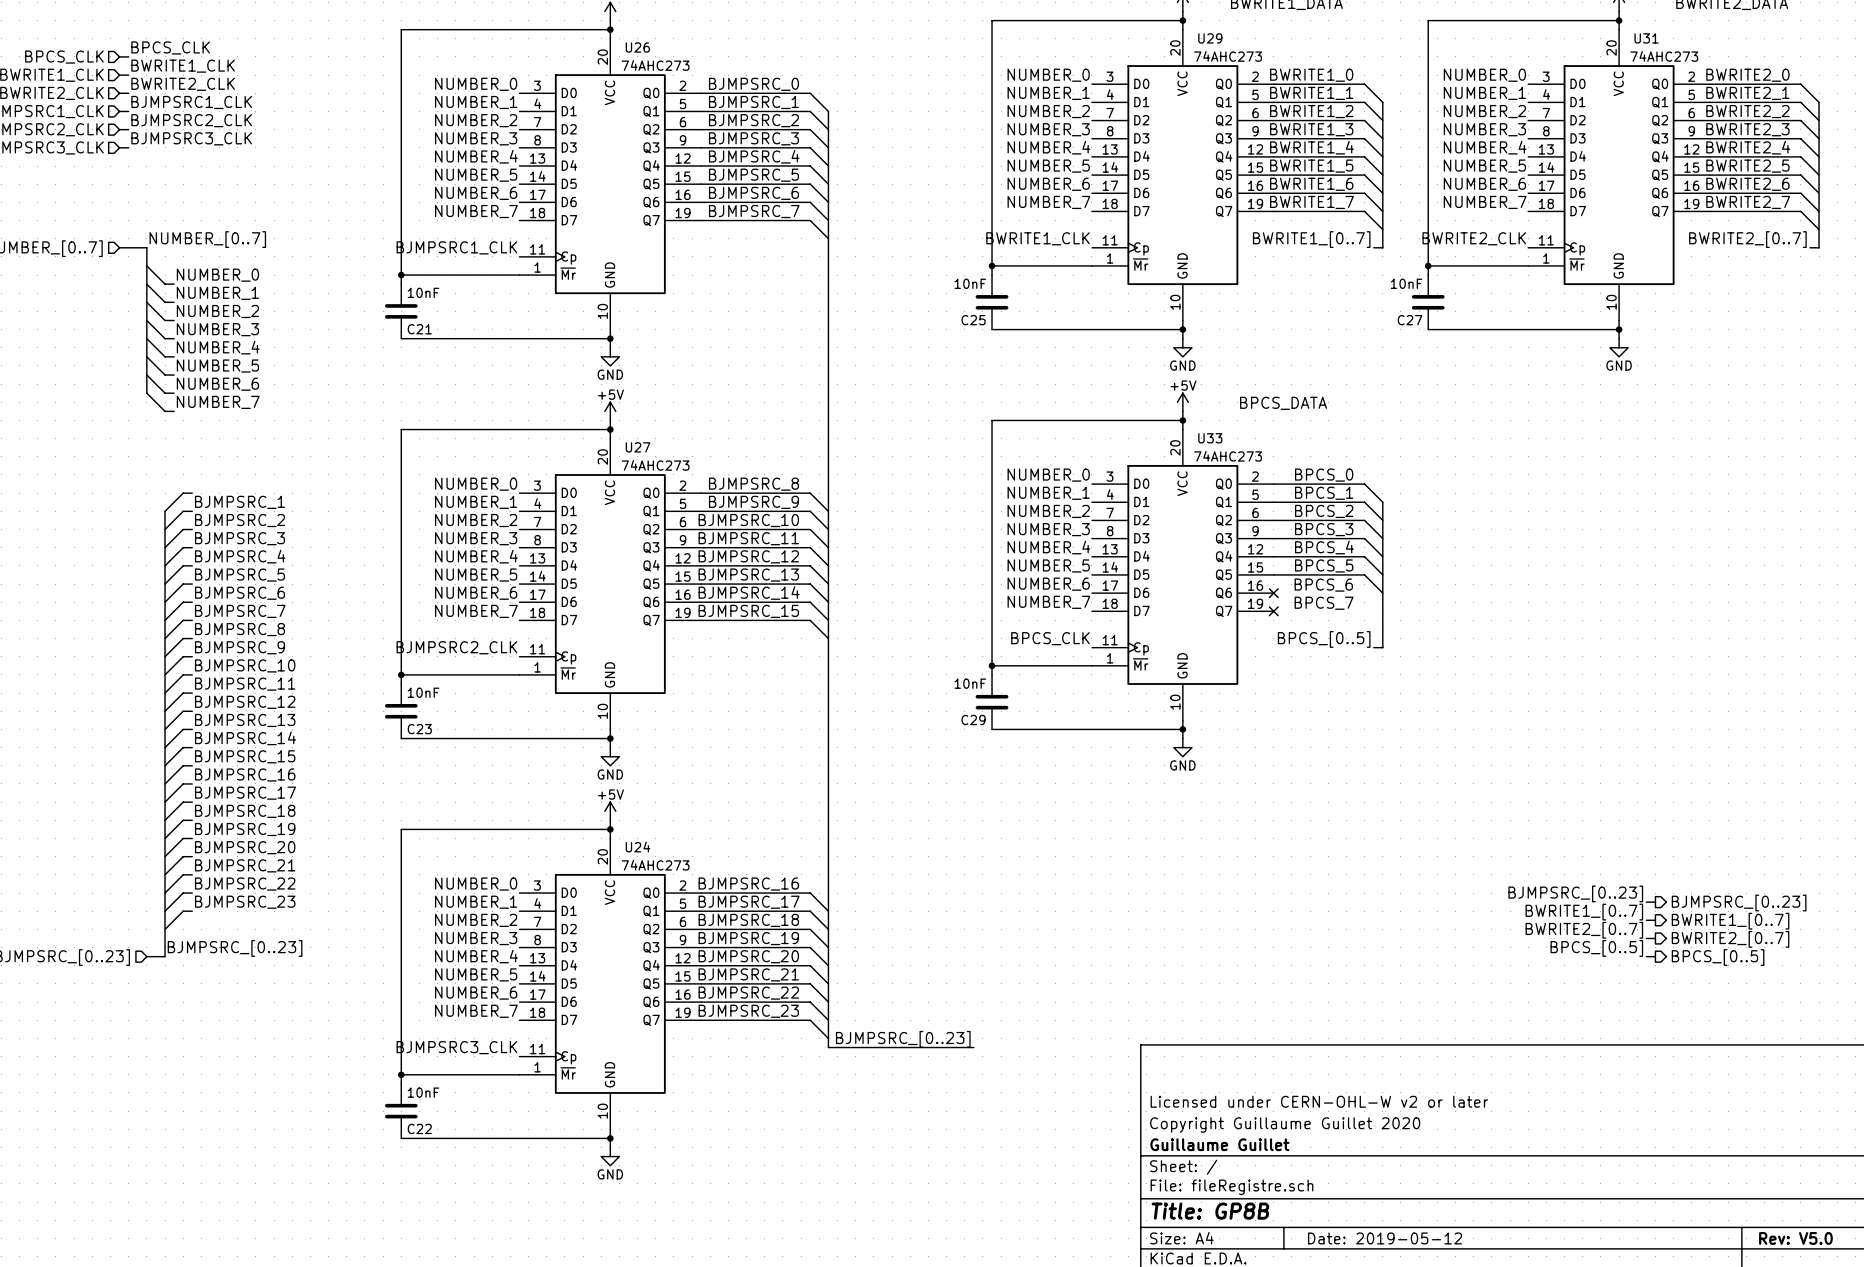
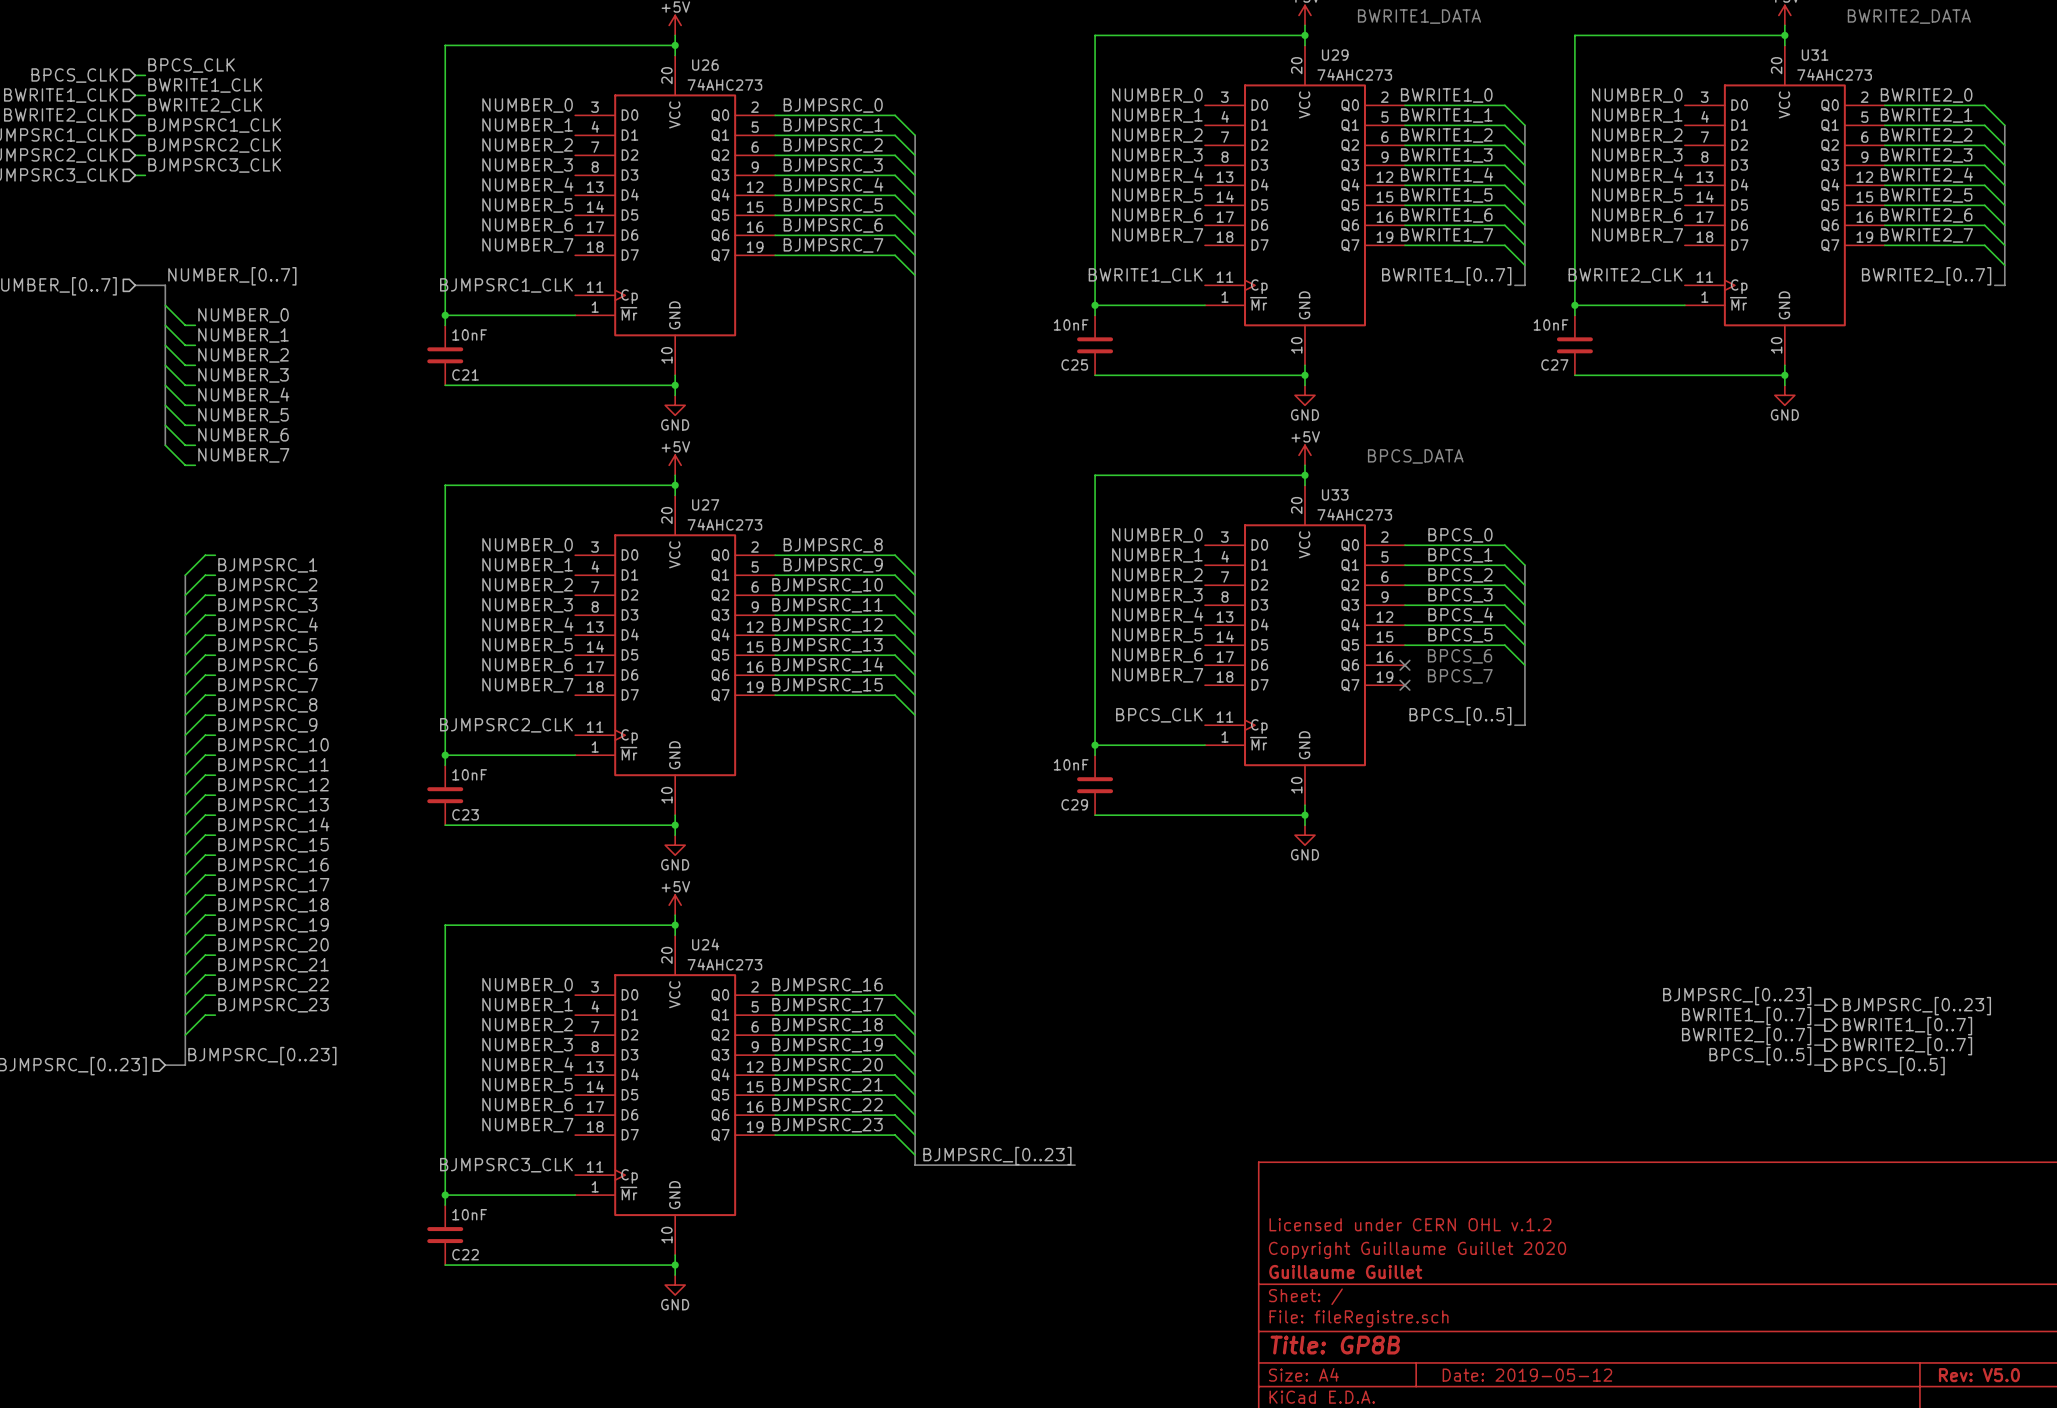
title block: Licensed under CERN-OHL-W v2 or later (1319, 1101) -> Licensed under CERN OHL v.1.2 (1410, 1224)

